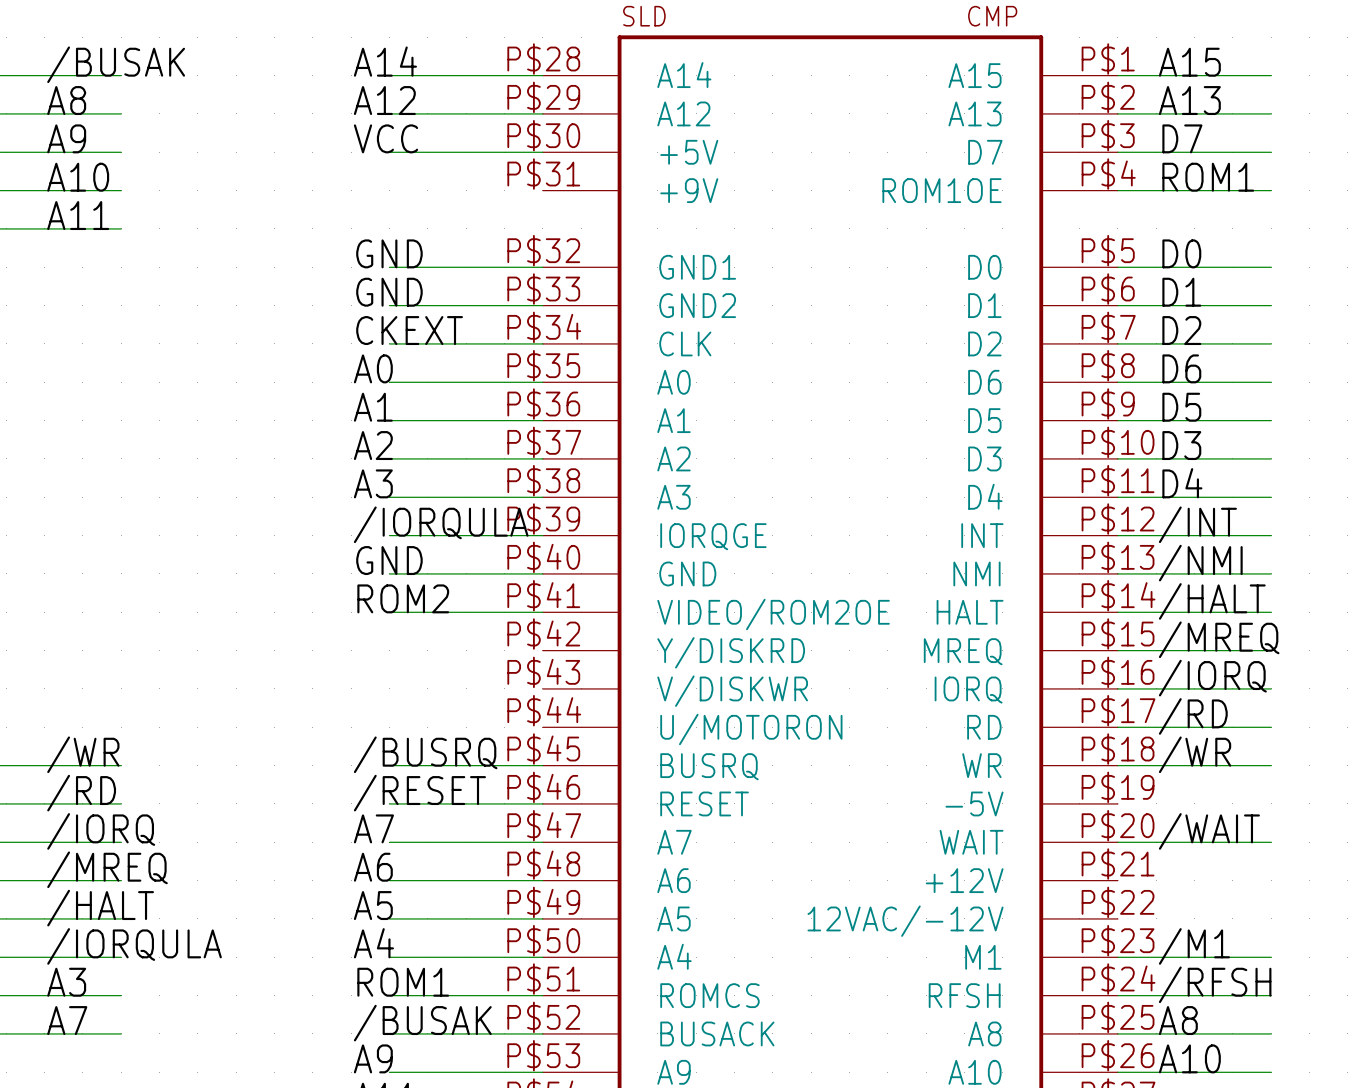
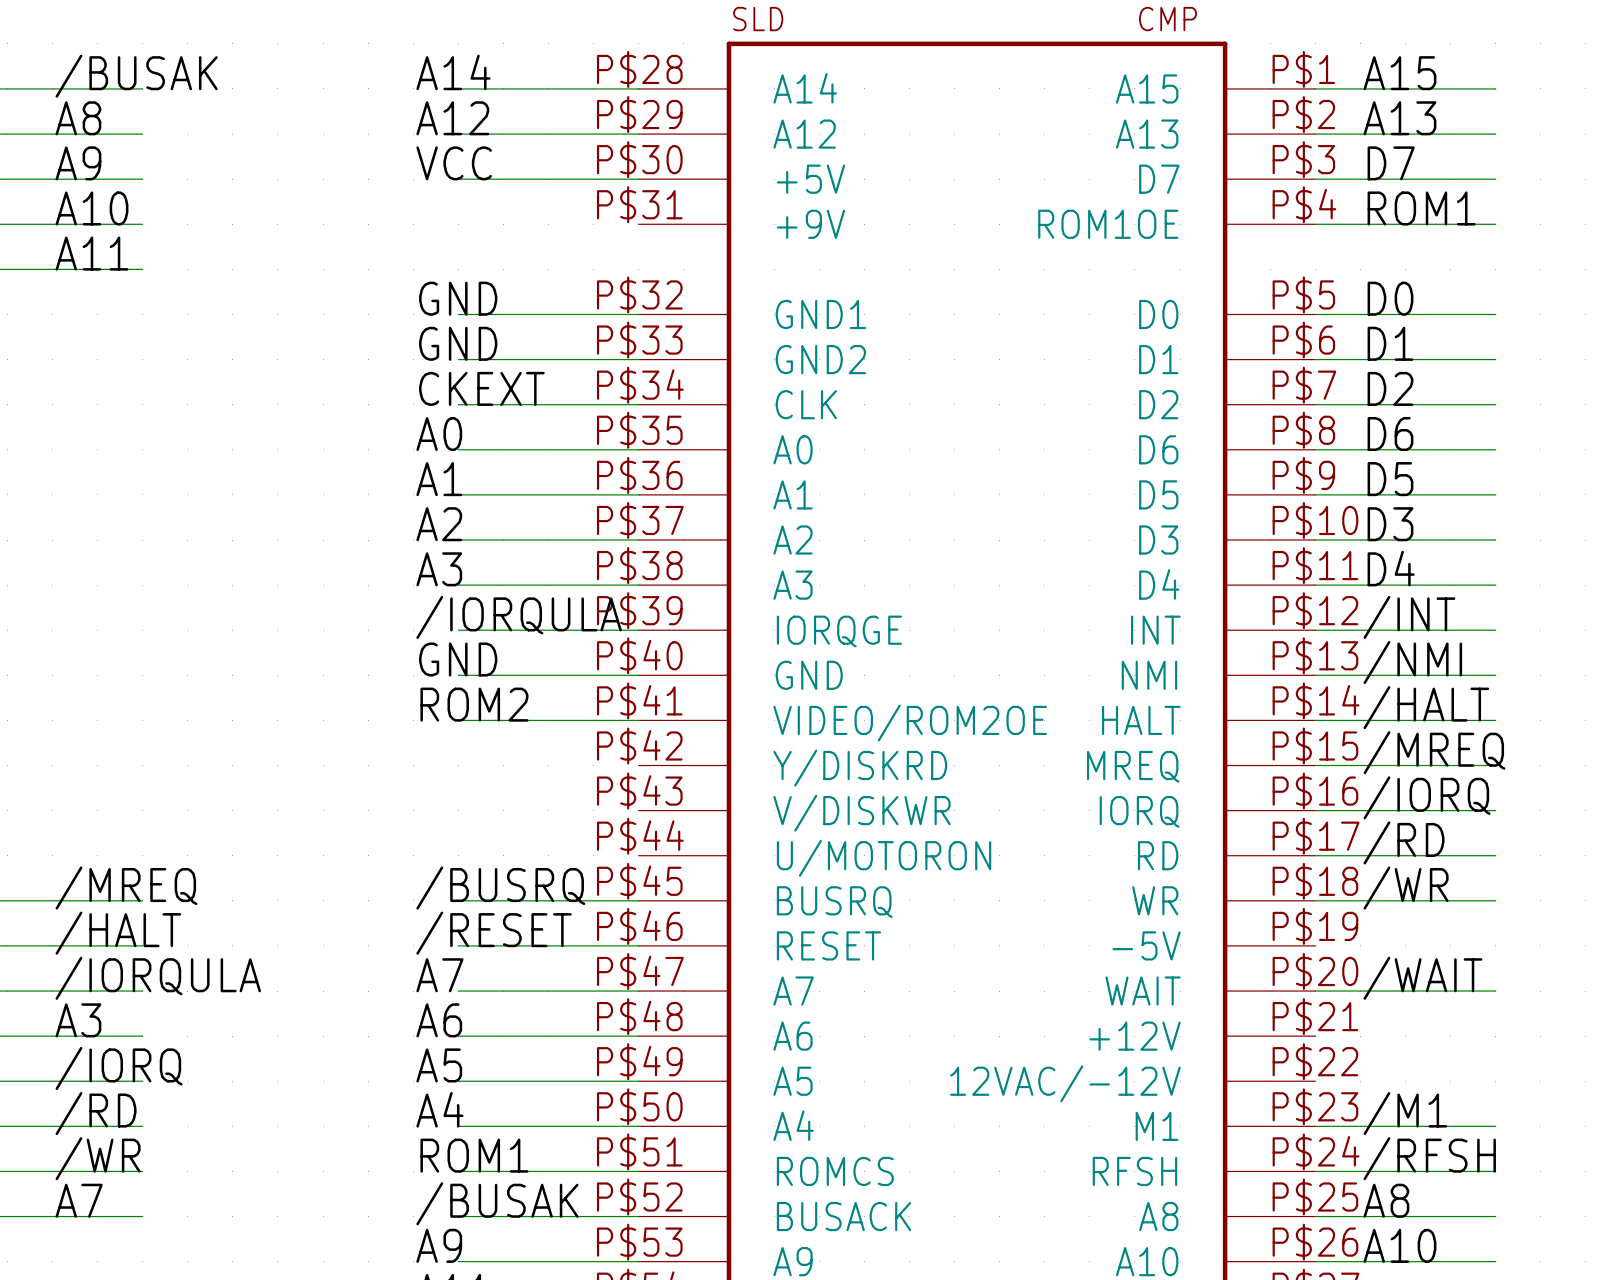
label: /WR (83, 754) -> /MREQ (126, 888)
label: /RD (81, 793) -> /HALT (118, 933)
label: /IORQ (101, 831) -> /IORQULA (158, 978)
label: /MREQ (107, 869) -> A3 (78, 1020)
label: /HALT (100, 908) -> /IORQ (119, 1068)
label: /IORQULA (134, 946) -> /RD (96, 1113)
label: A3 (66, 982) -> /WR (98, 1158)

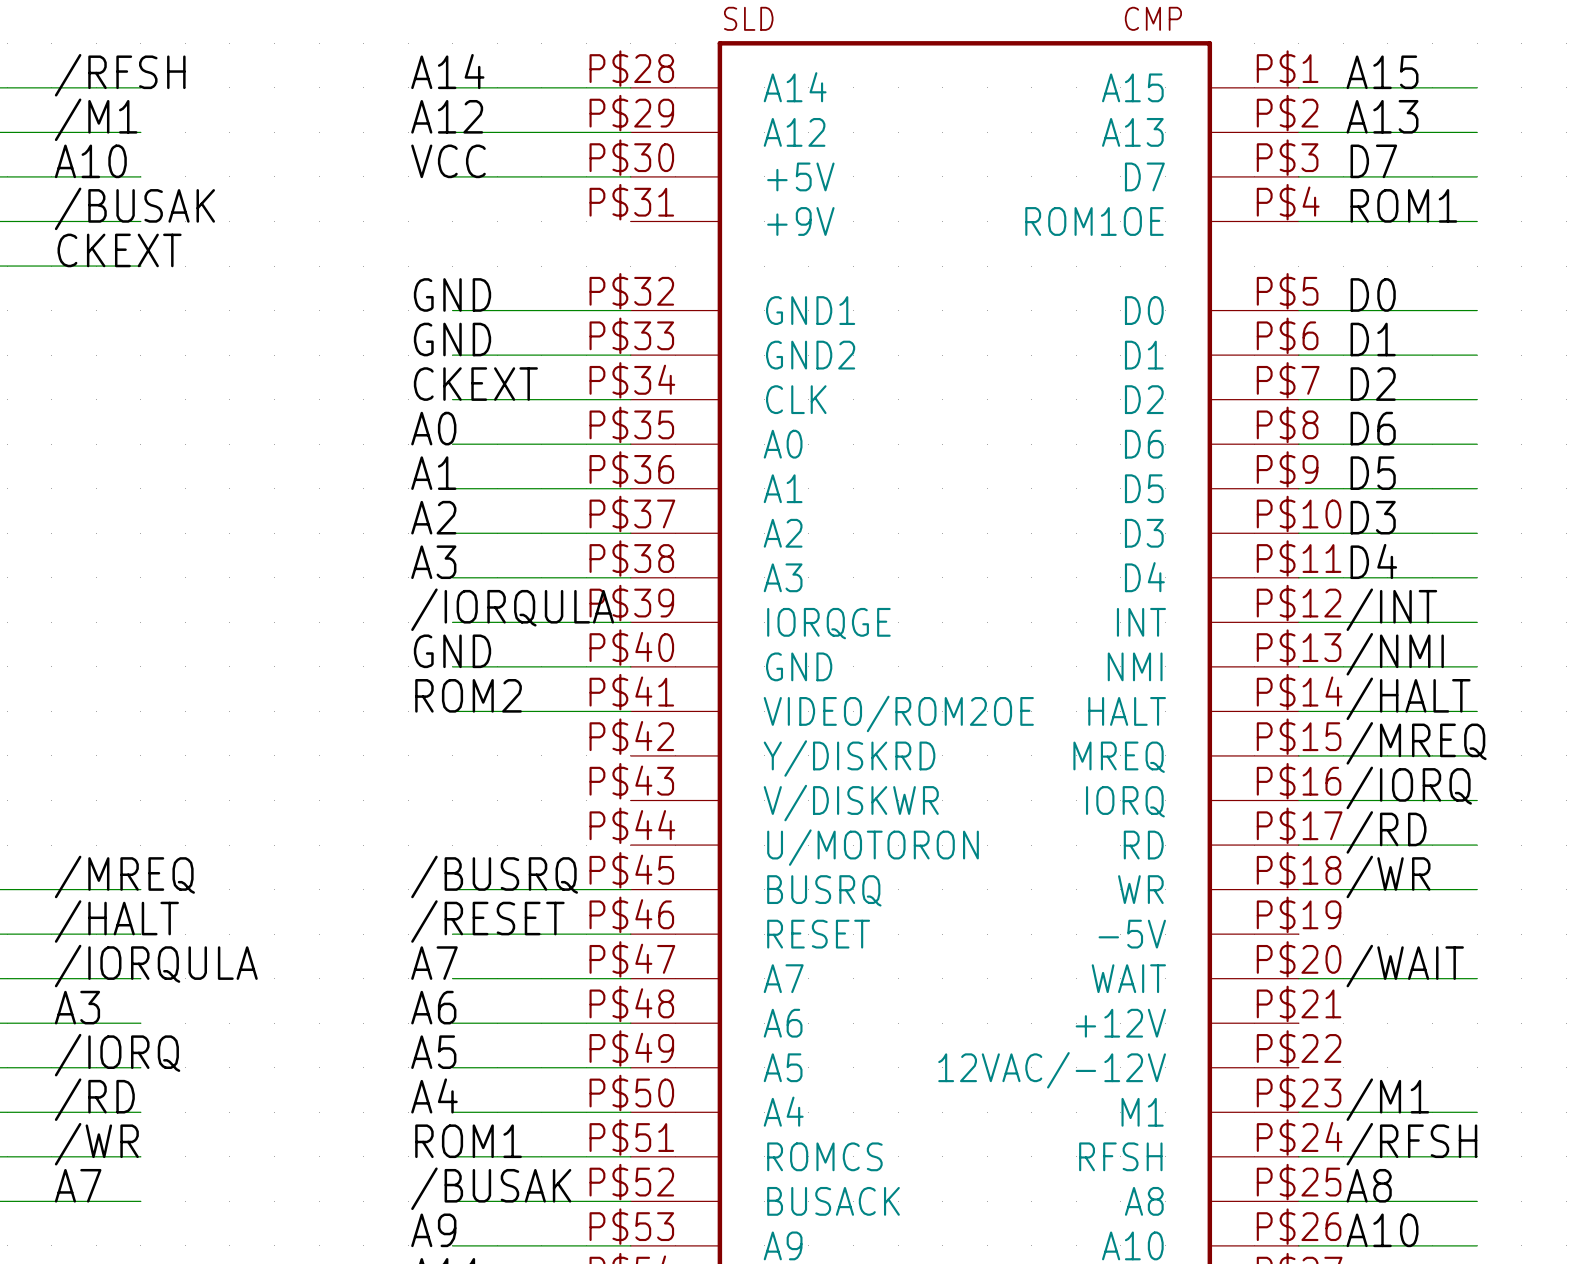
label: /BUSAK (136, 76) -> /RFSH (120, 75)
label: A8 (78, 118) -> /M1 (96, 119)
label: A9 (78, 163) -> A10 (90, 161)
label: A10 (91, 208) -> /BUSAK (134, 208)
label: A11 (91, 253) -> CKEXT (119, 250)

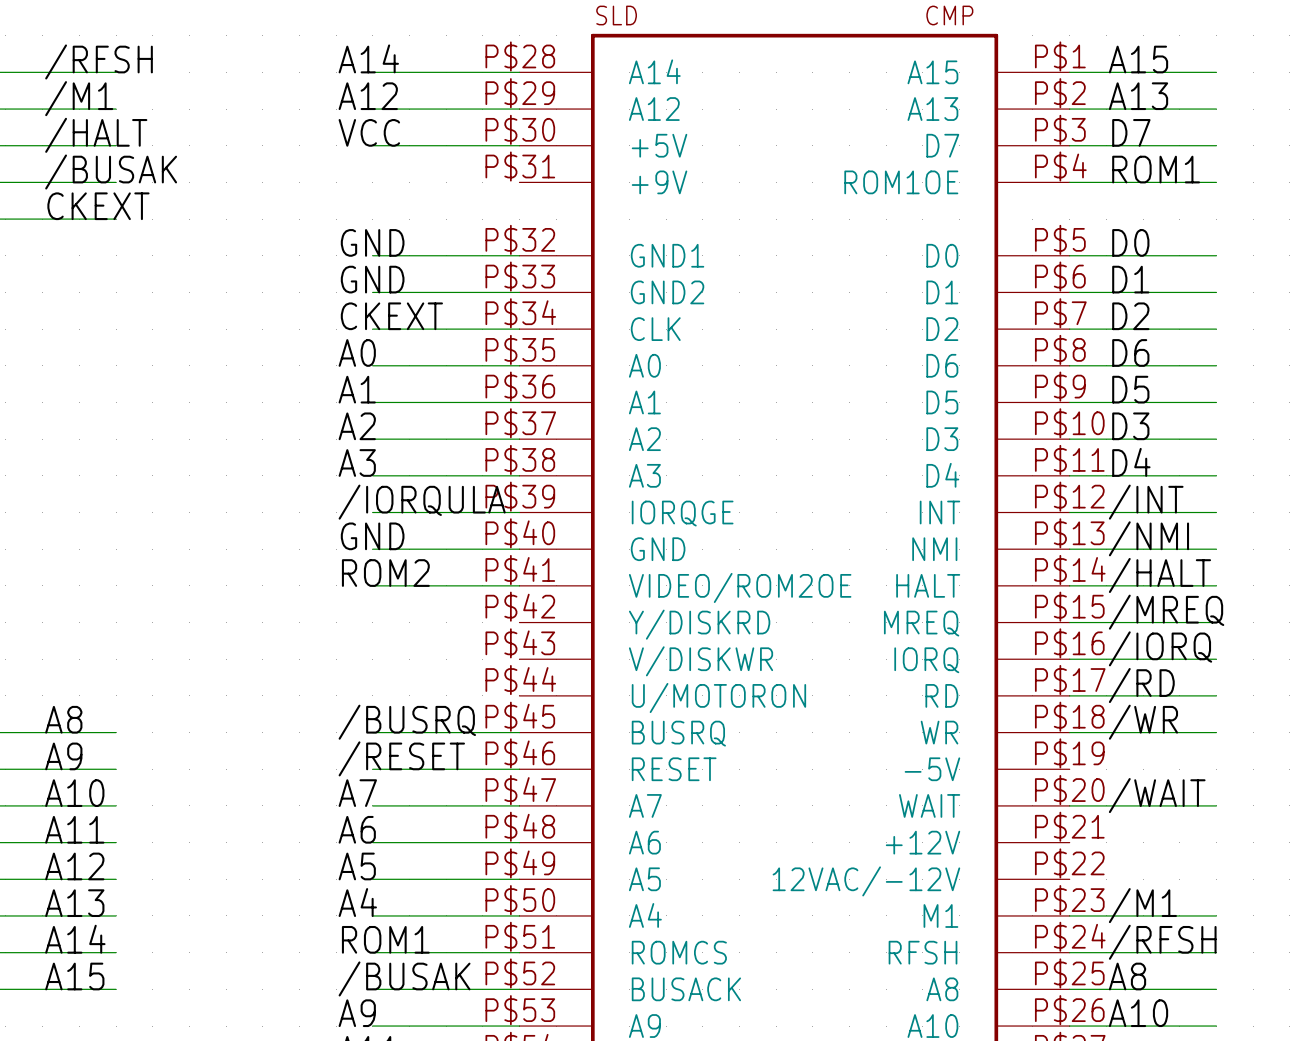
label: A10 (90, 161) -> /HALT (96, 135)
label: /MREQ (124, 876) -> A8 (63, 719)
label: /HALT (116, 921) -> A9 (63, 756)
label: /IORQULA (156, 966) -> A10 (74, 793)
label: A3 (77, 1007) -> A11 (74, 829)
label: /IORQ (117, 1055) -> A12 (74, 866)
label: /RD (94, 1099) -> A13 (74, 903)
label: /WR (96, 1144) -> A14 (75, 939)
label: A7 (78, 1185) -> A15 (74, 976)

